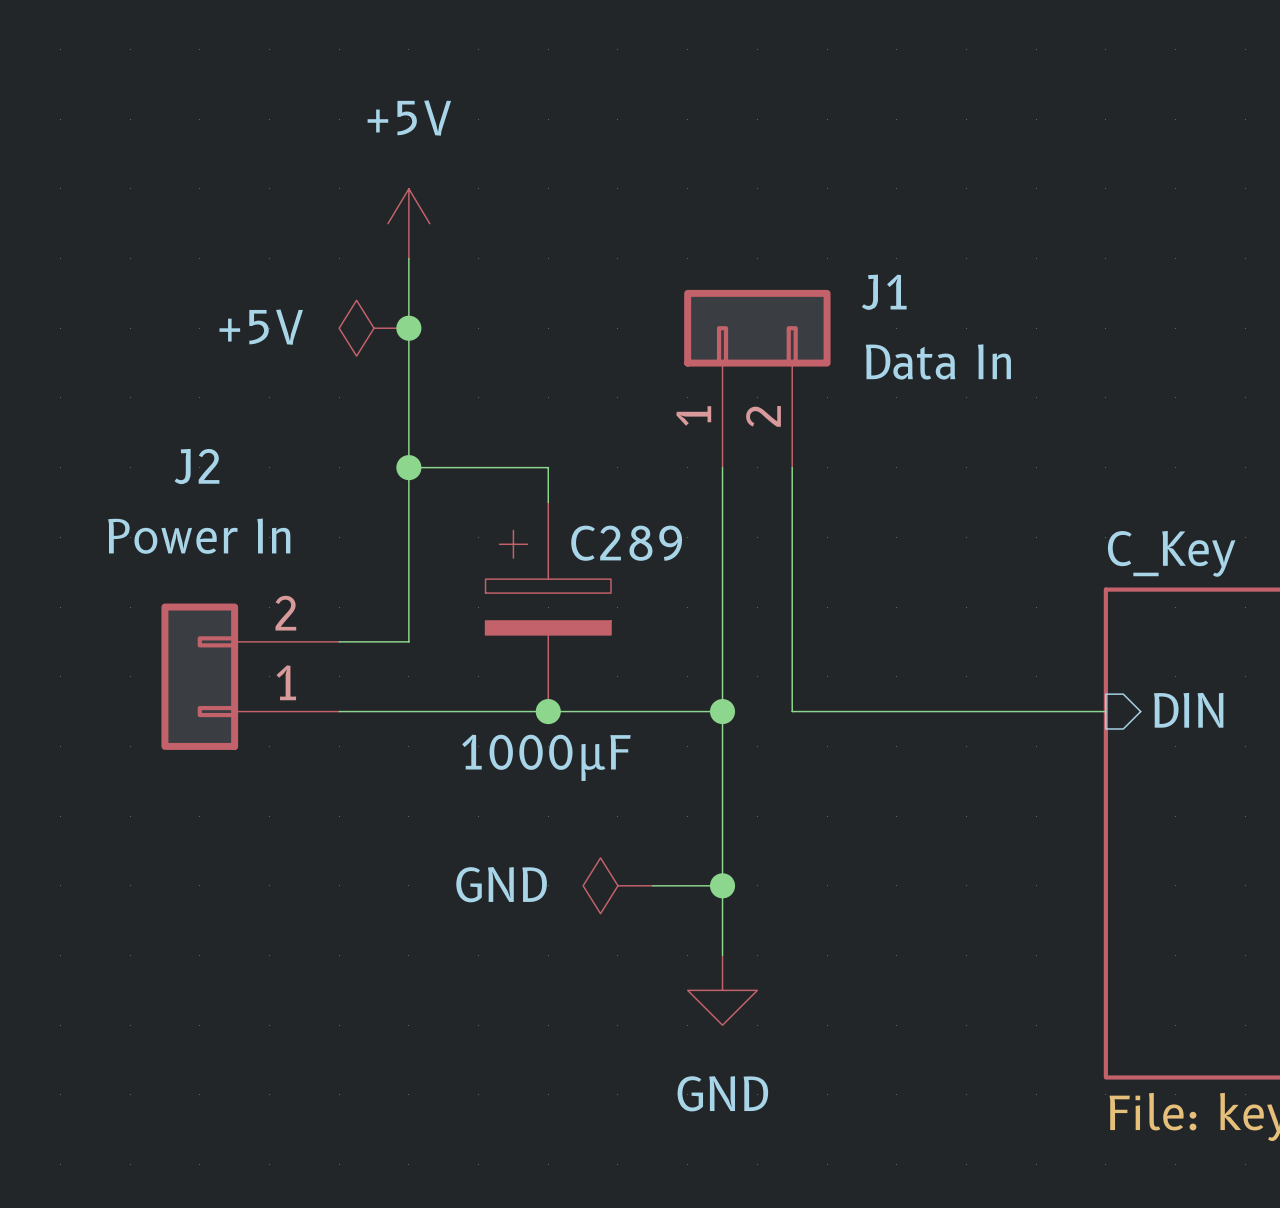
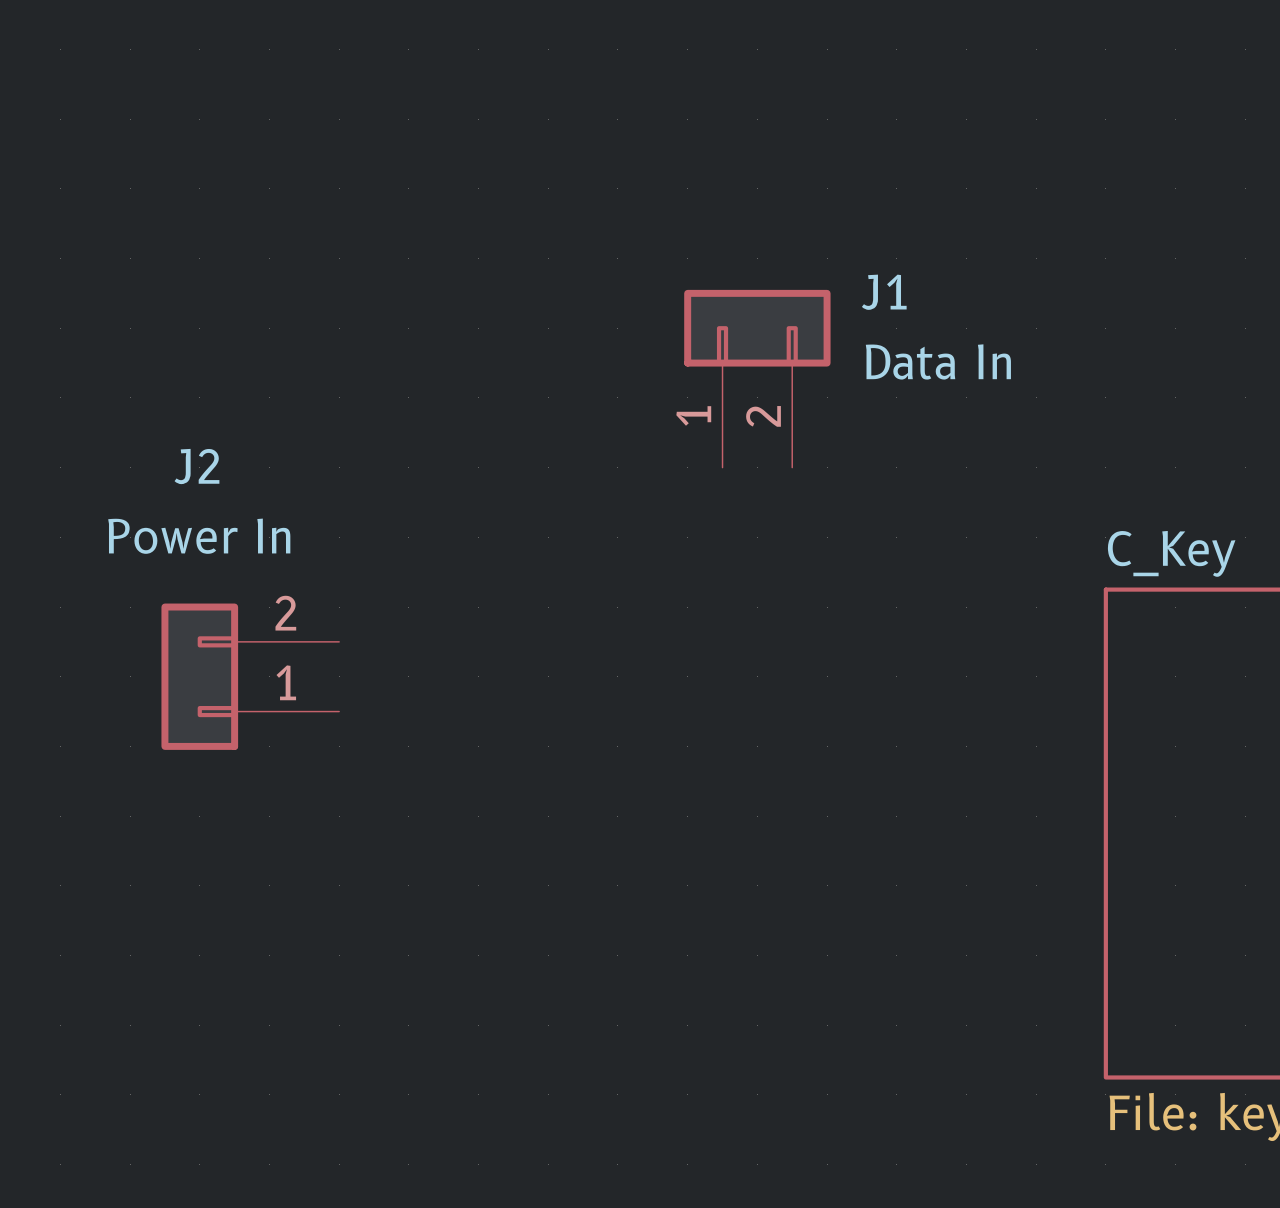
power symbol: +5V (408, 223) -> none
wire: (408, 258) (408, 641) (339, 641) -> none
power symbol: +5V (374, 328) -> none
junction: (408, 328) -> none
wire: (408, 467) (548, 467) (548, 502) -> none
junction: (408, 467) -> none
wire: (722, 467) (722, 955) -> none
wire: (792, 467) (792, 711) (1105, 711) -> none
C289: 1000µF (548, 607) -> none
sheet pin: DIN (1188, 710) -> none
wire: (339, 711) (722, 711) -> none
junction: (548, 711) -> none
junction: (722, 711) -> none
power symbol: GND (617, 885) -> none
wire: (652, 885) (722, 885) -> none
junction: (722, 885) -> none
power symbol: GND (722, 990) -> none

